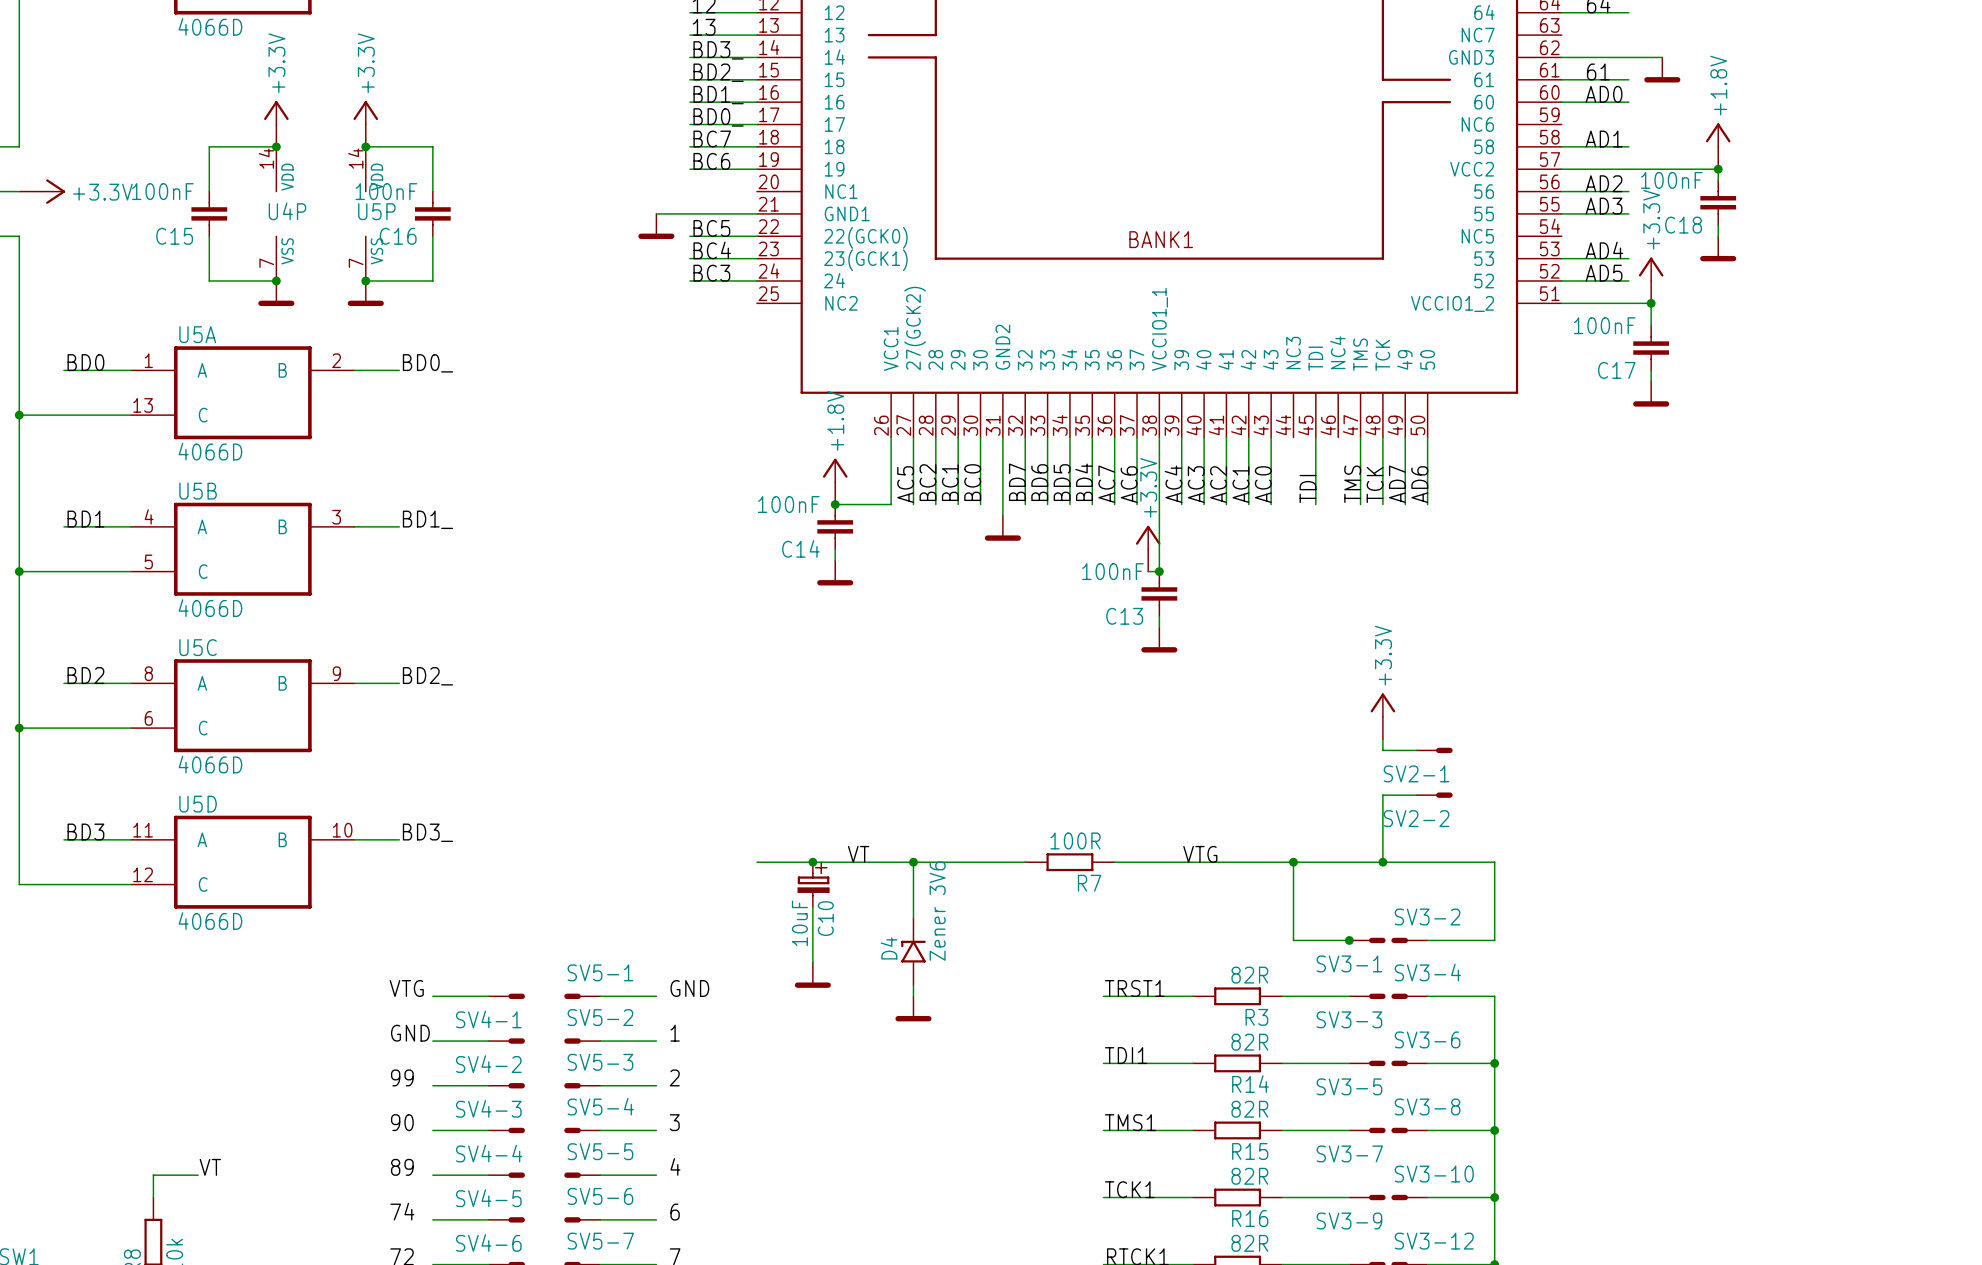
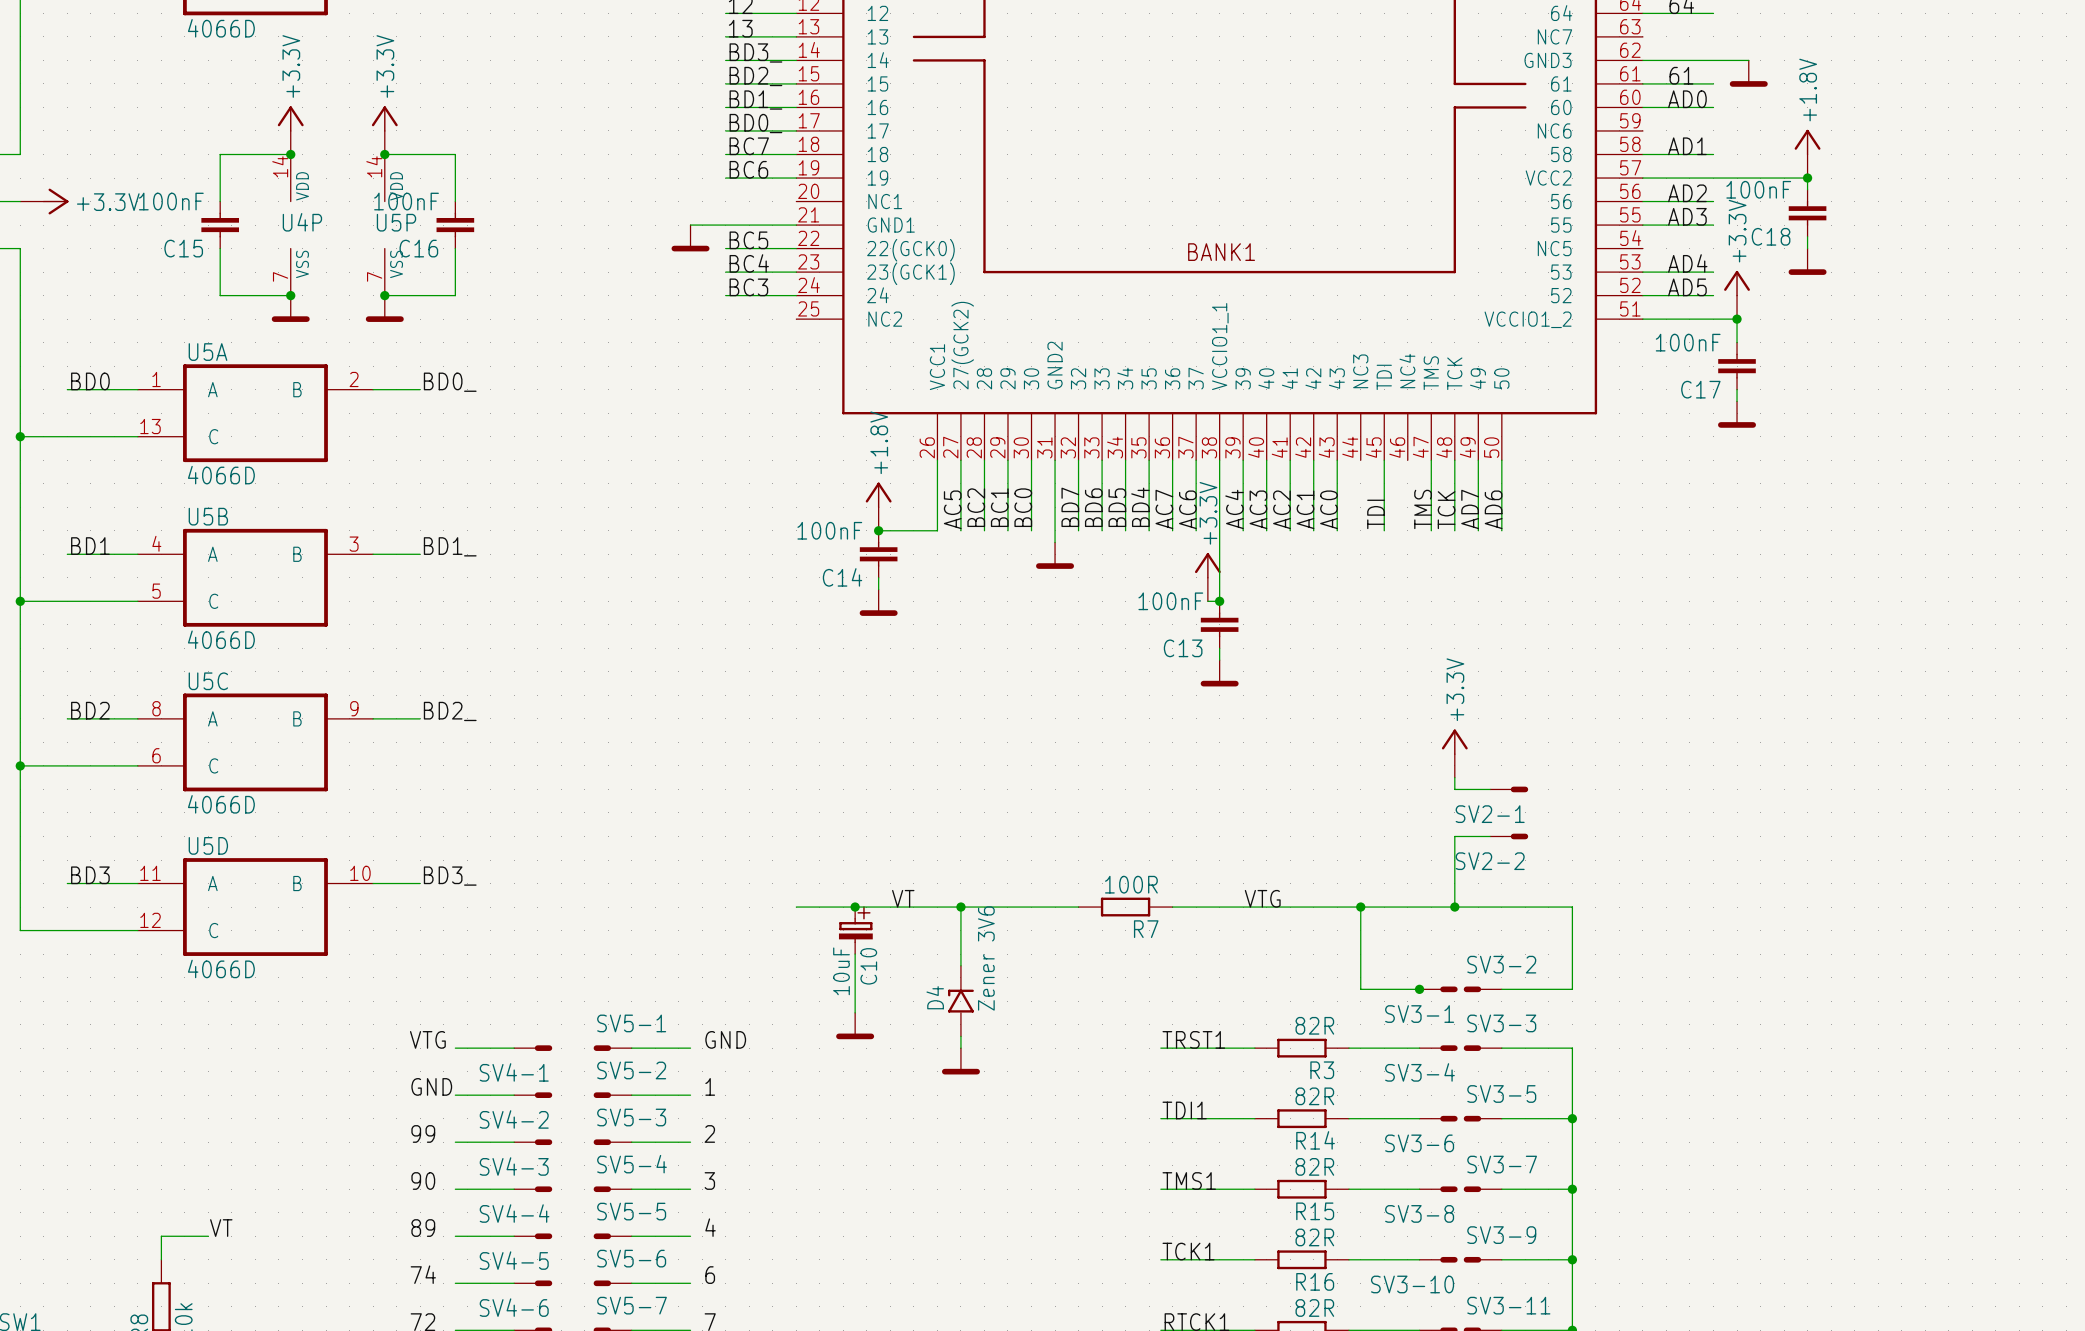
SV3-4 name: SV3-4 (1427, 972) -> SV3-3 (1501, 1023)
SV3-3 name: SV3-3 (1349, 1019) -> SV3-4 (1419, 1072)
SV3-6 name: SV3-6 (1427, 1039) -> SV3-5 (1501, 1093)
SV3-5 name: SV3-5 (1349, 1086) -> SV3-6 (1419, 1143)
SV3-8 name: SV3-8 (1427, 1106) -> SV3-7 (1502, 1164)
SV3-7 name: SV3-7 (1349, 1153) -> SV3-8 (1419, 1213)
SV3-10 name: SV3-10 (1434, 1174) -> SV3-9 (1501, 1235)
SV3-9 name: SV3-9 (1349, 1220) -> SV3-10 (1412, 1284)
SV3-12 name: SV3-12 (1434, 1241) -> SV3-11 (1508, 1305)

